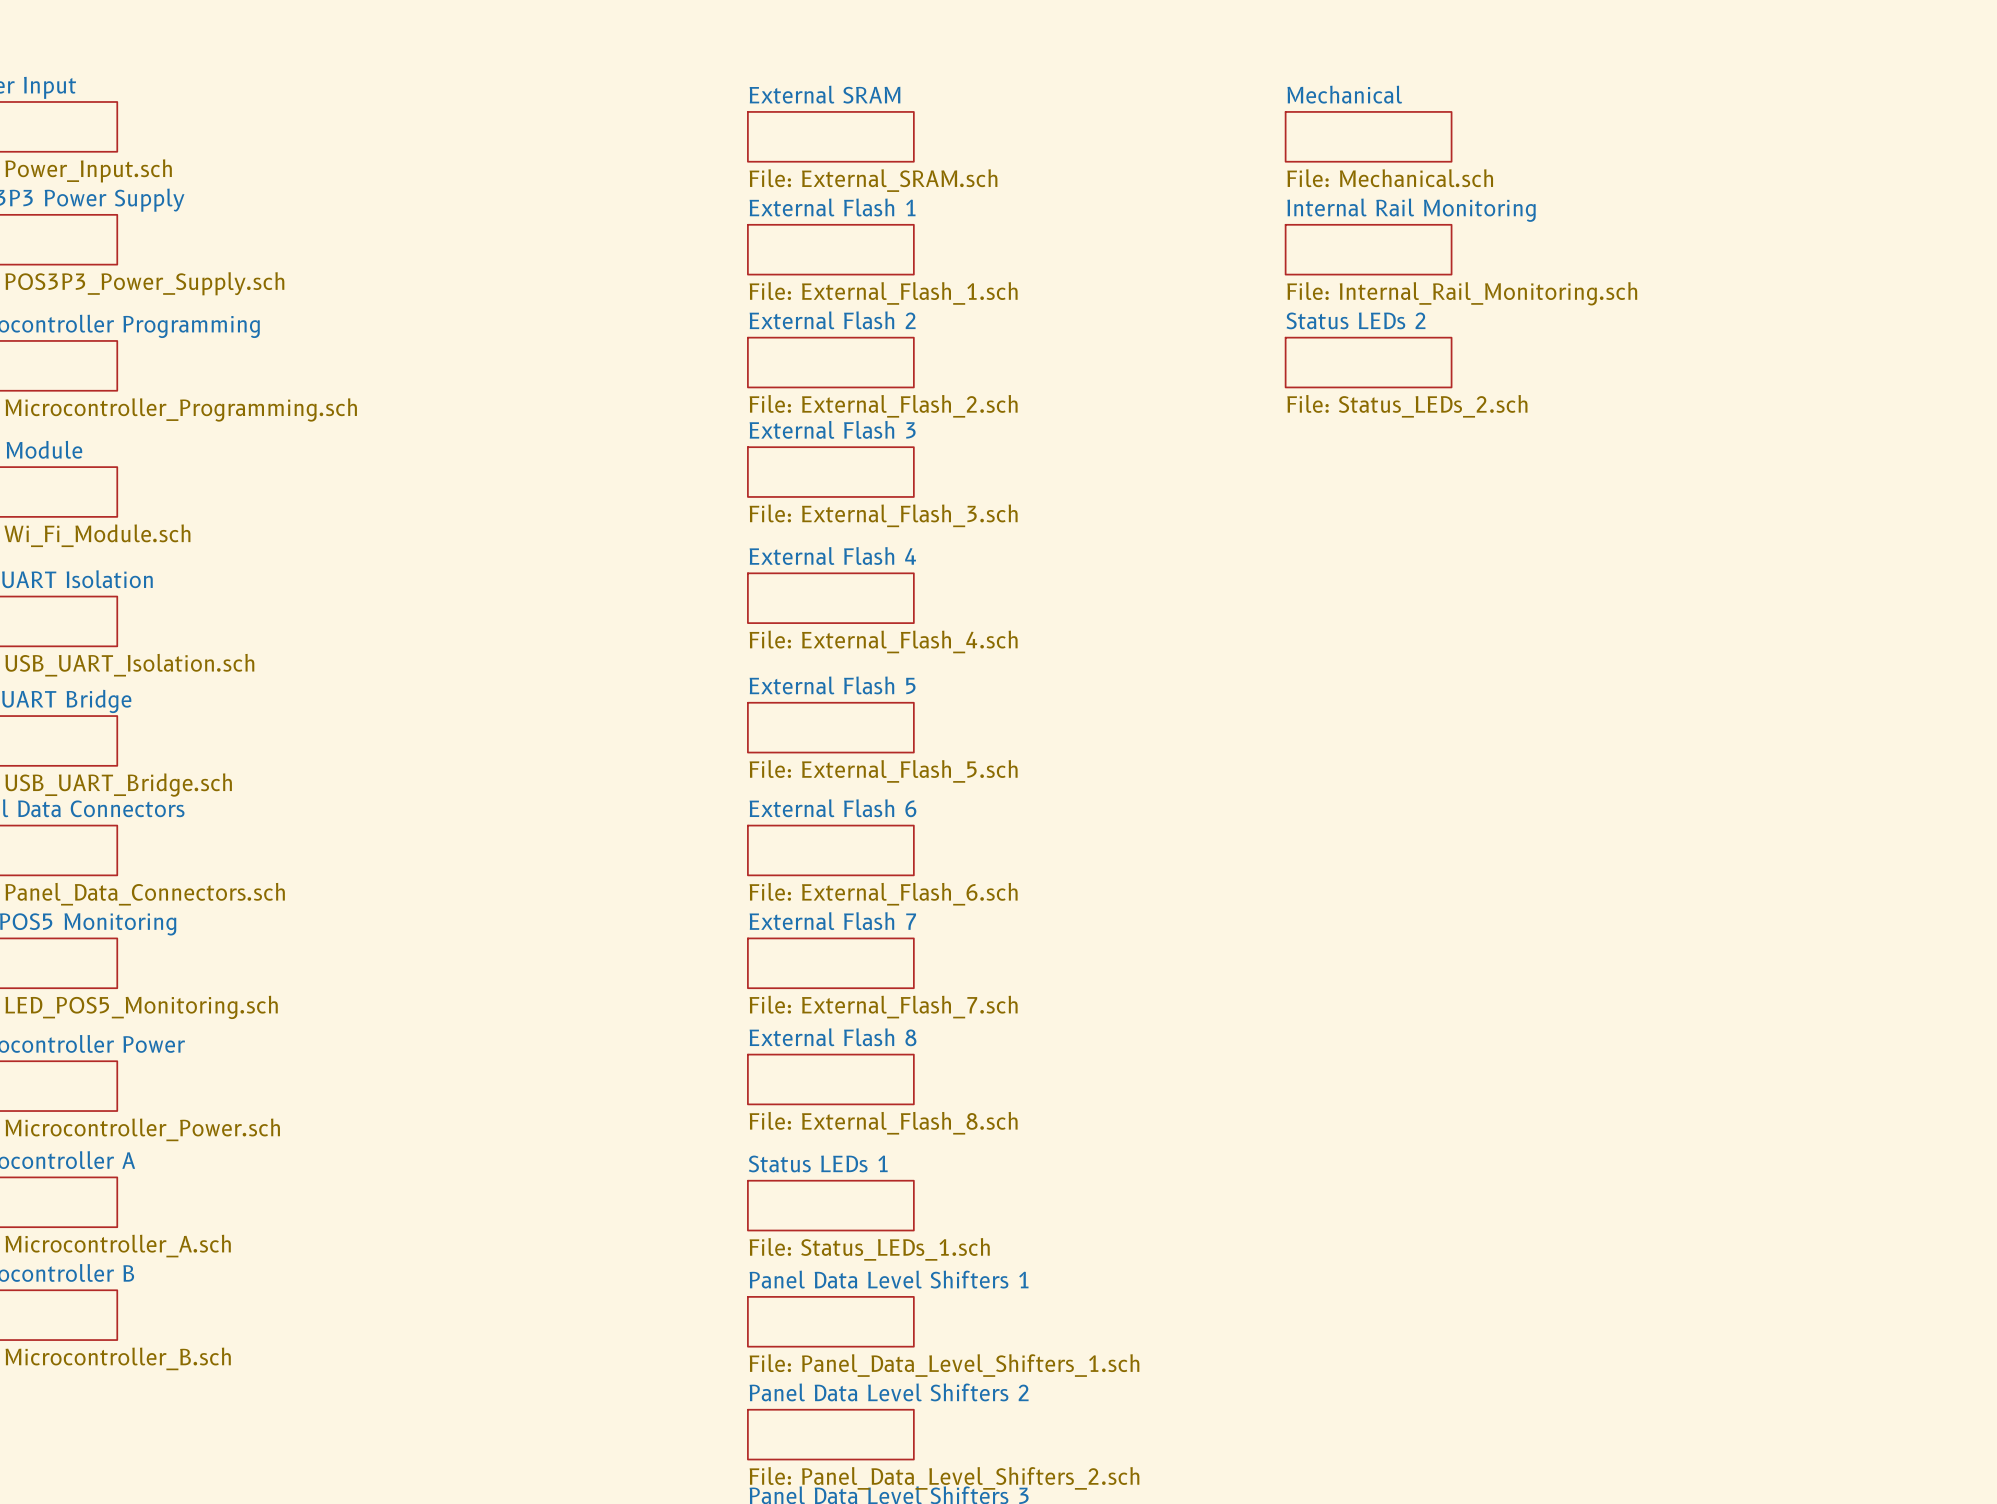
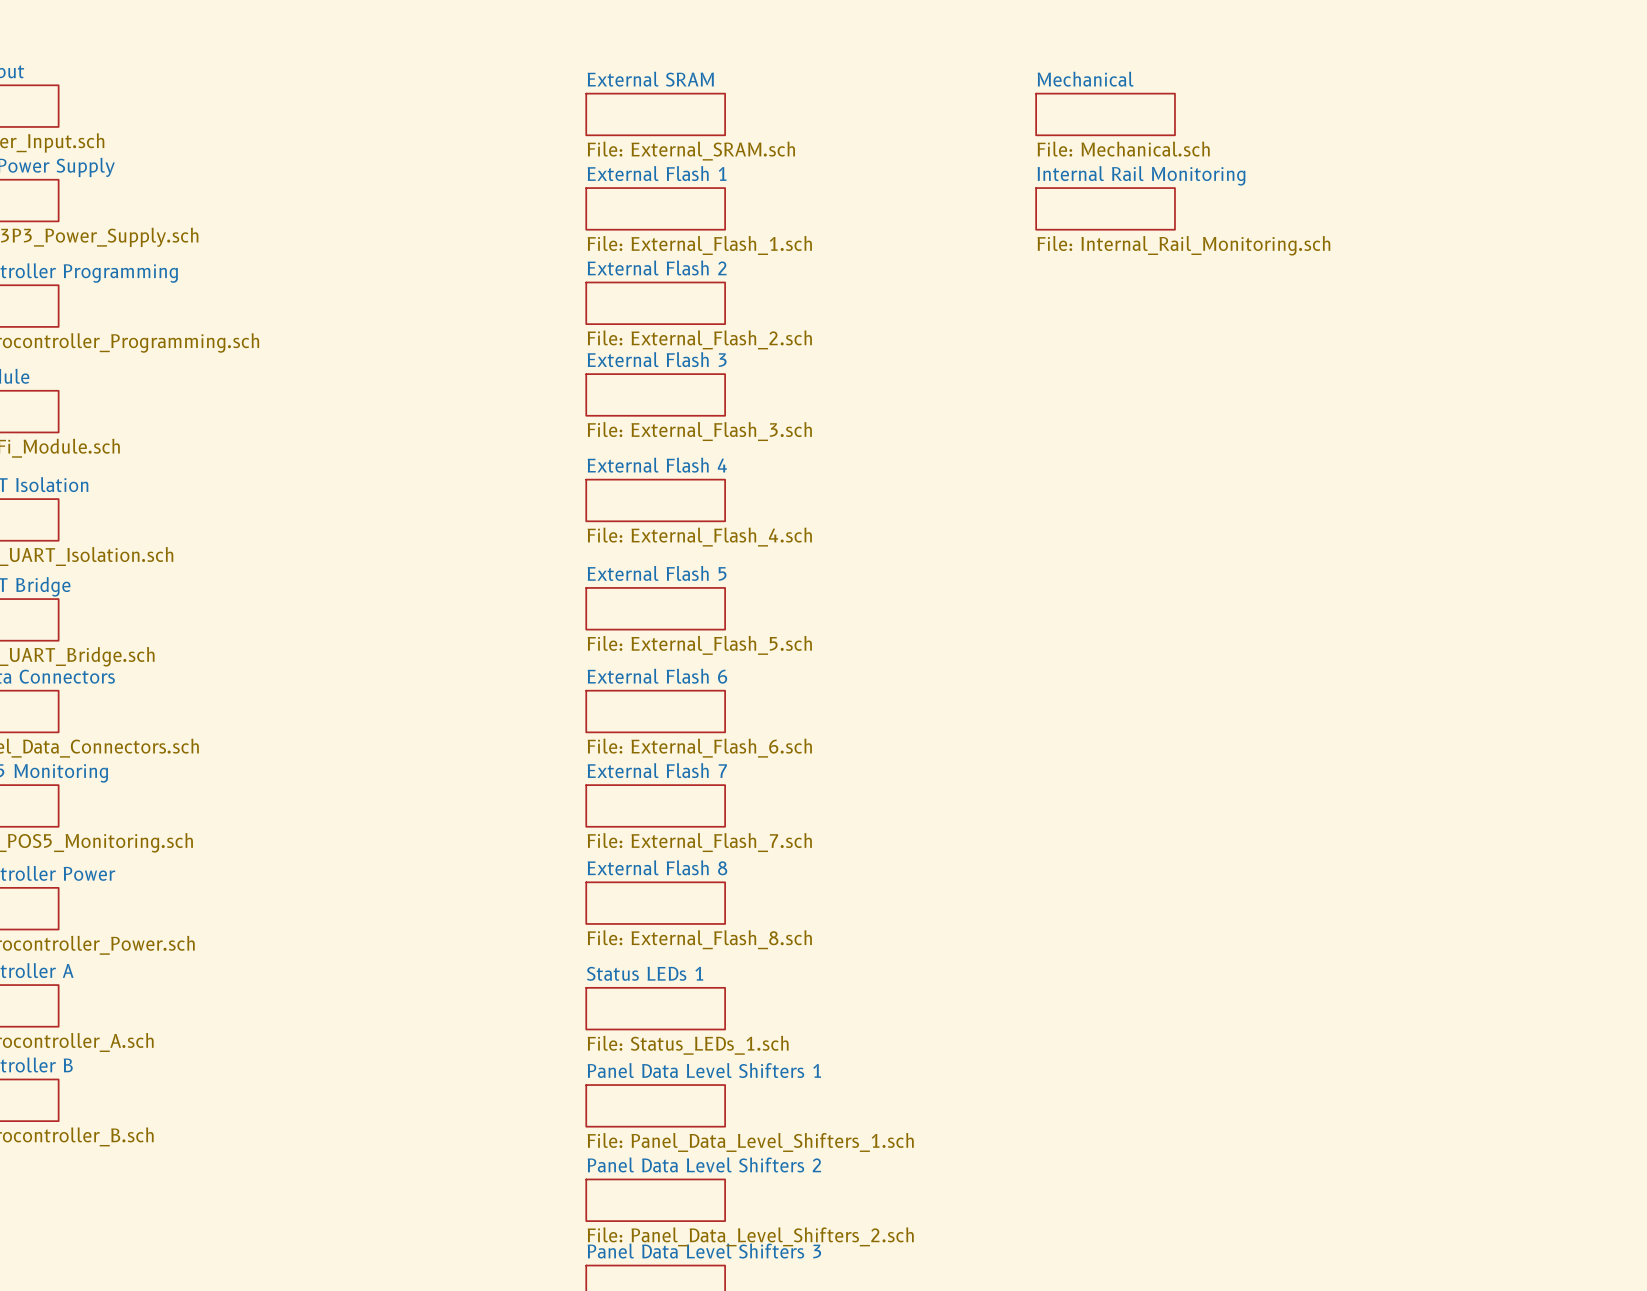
sheet Status LEDs 2: File: Status_LEDs_2.sch (1368, 362) -> none

